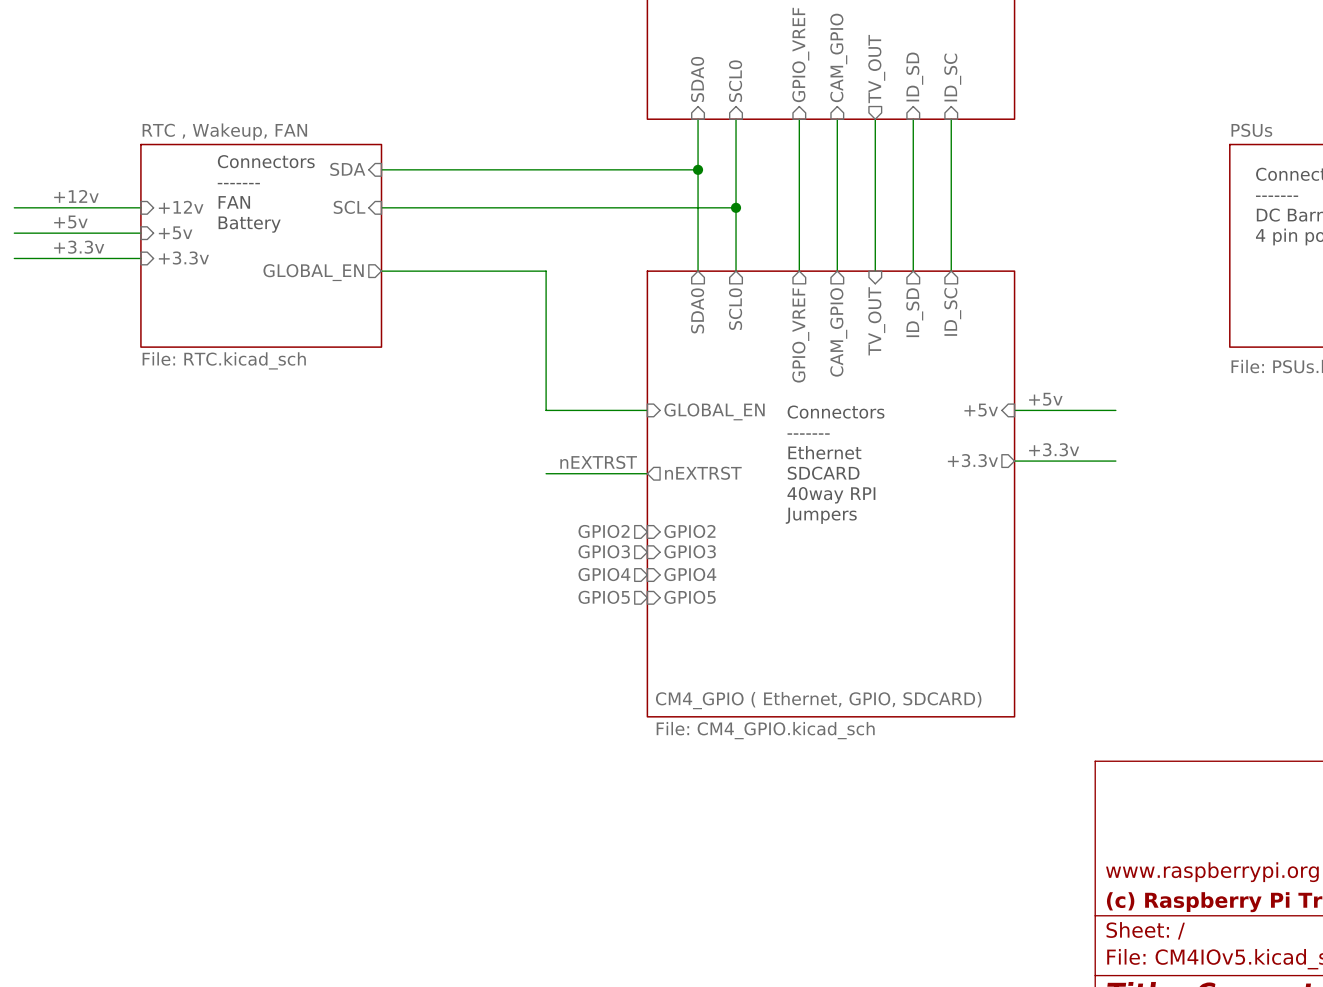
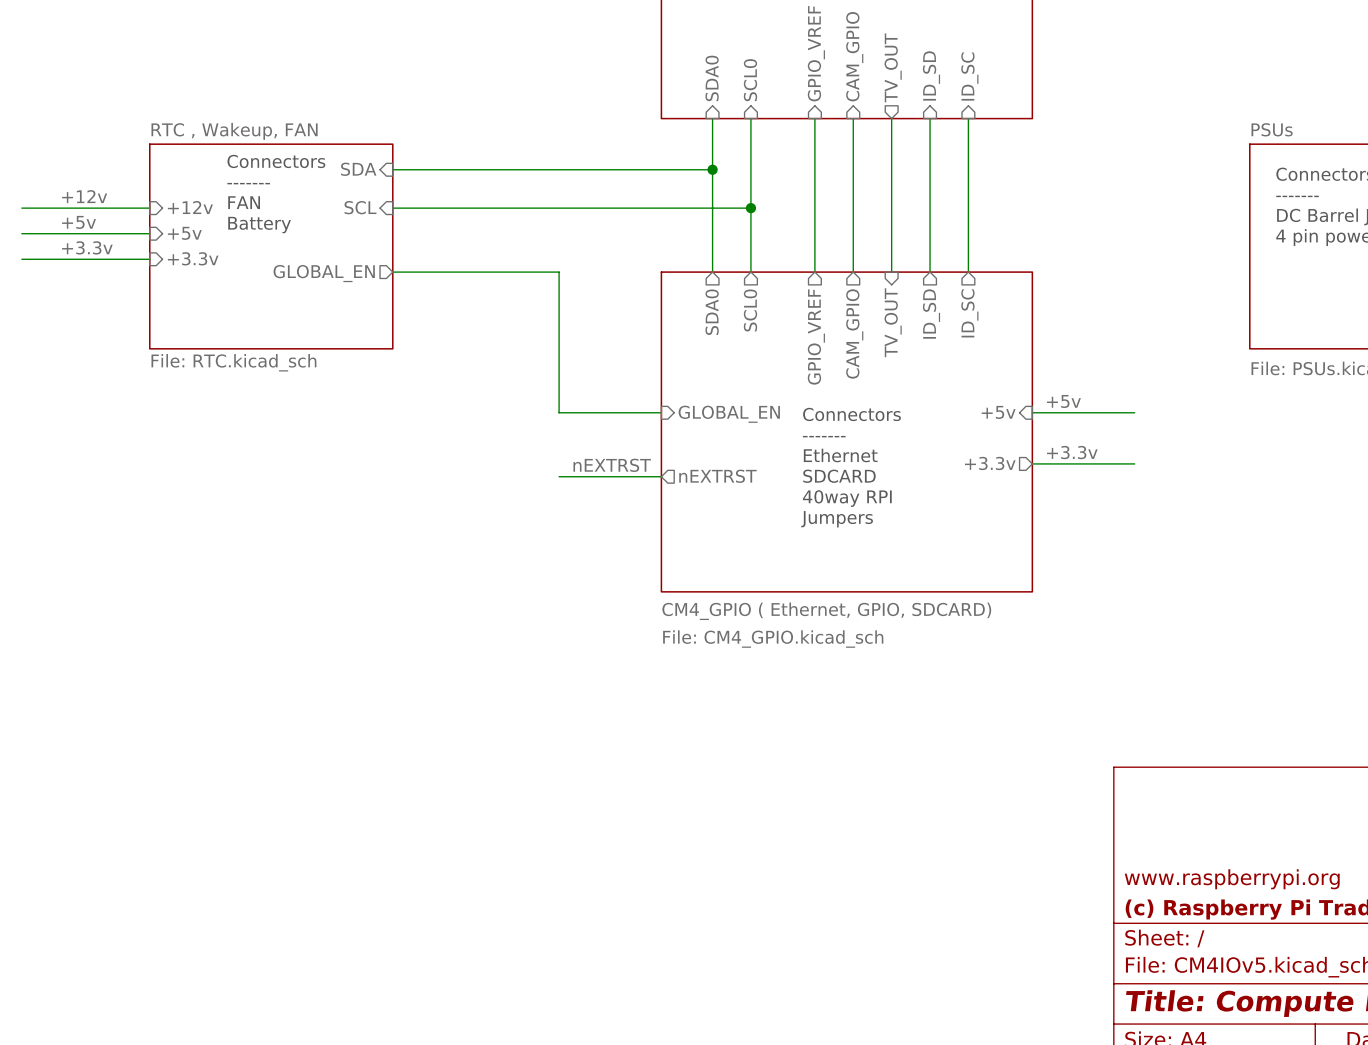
sheet CM4_GPIO ( Ethernet, GPIO, SDCARD) shape: [646, 270, 1016, 718] -> [660, 271, 1034, 593]
hierarchical label: GPIO2 (604, 531) -> none
sheet pin: GPIO2 (689, 531) -> none
hierarchical label: GPIO3 (604, 551) -> none
sheet pin: GPIO3 (690, 551) -> none
hierarchical label: GPIO4 (604, 574) -> none
sheet pin: GPIO4 (690, 574) -> none
hierarchical label: GPIO5 (604, 597) -> none
sheet pin: GPIO5 (690, 597) -> none
sheet CM4_GPIO ( Ethernet, GPIO, SDCARD) name position: CM4_GPIO ( Ethernet, GPIO, SDCARD) (818, 700) -> CM4_GPIO ( Ethernet, GPIO, SDCARD) (826, 611)
sheet CM4_GPIO ( Ethernet, GPIO, SDCARD) value position: File: CM4_GPIO.kicad_sch (765, 730) -> File: CM4_GPIO.kicad_sch (773, 639)

